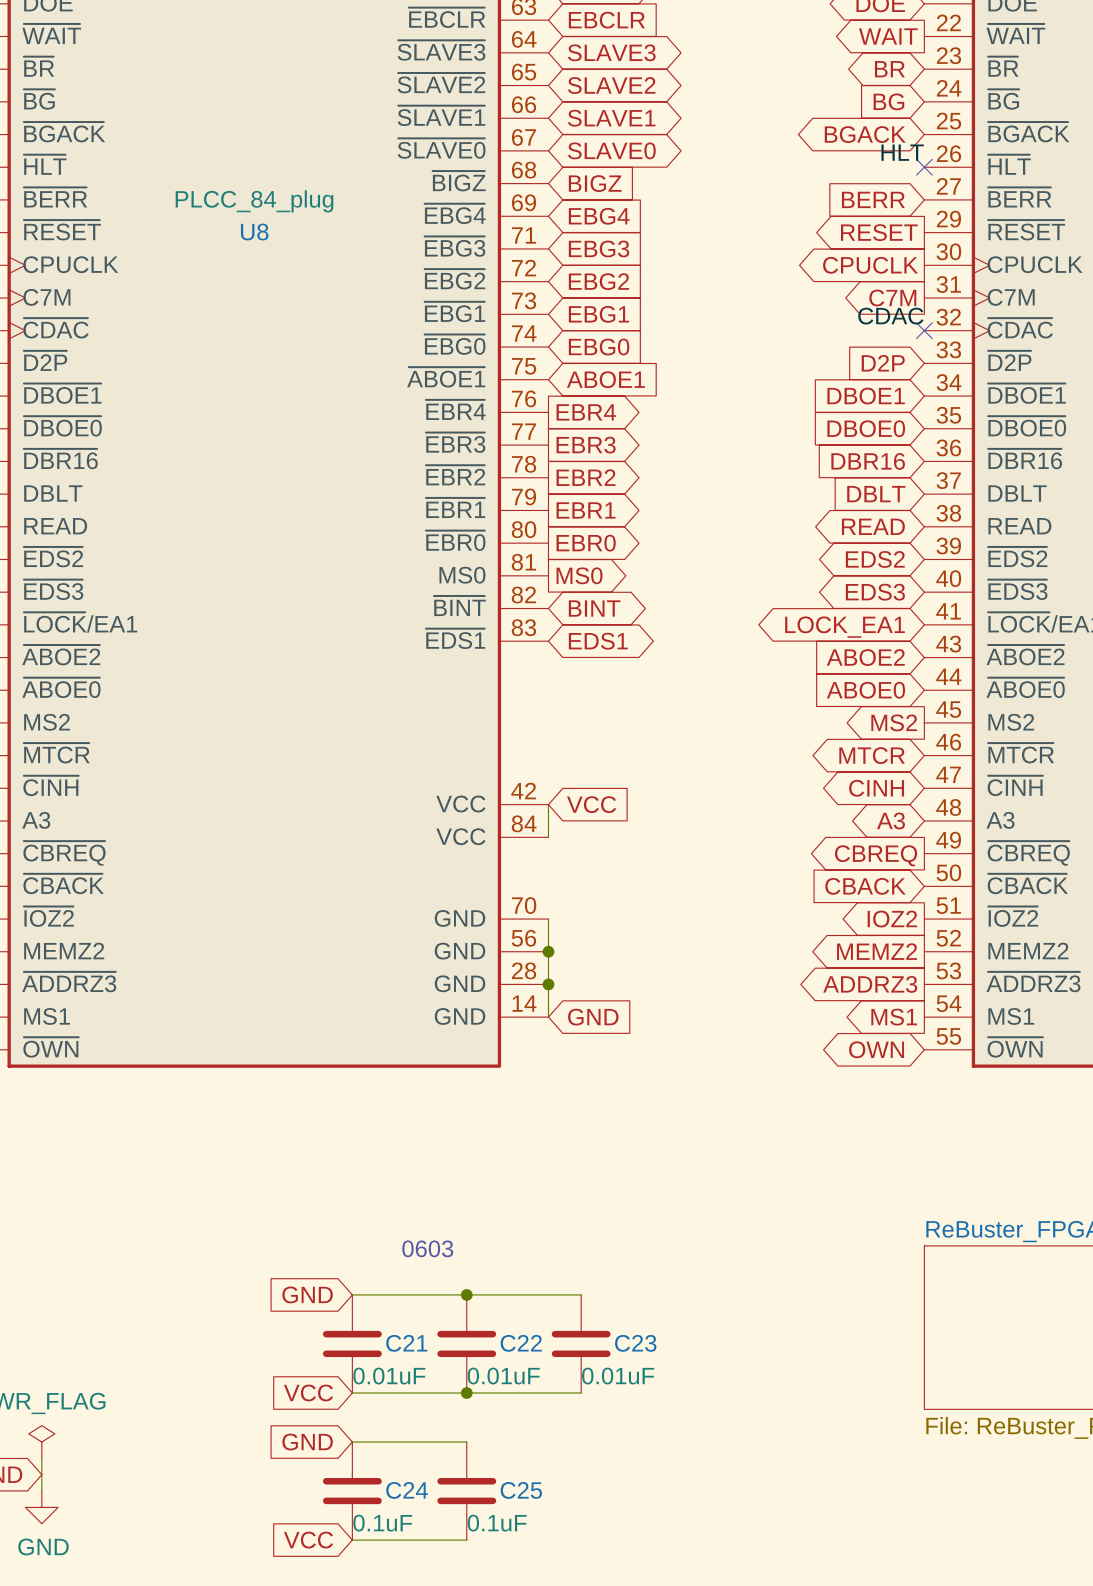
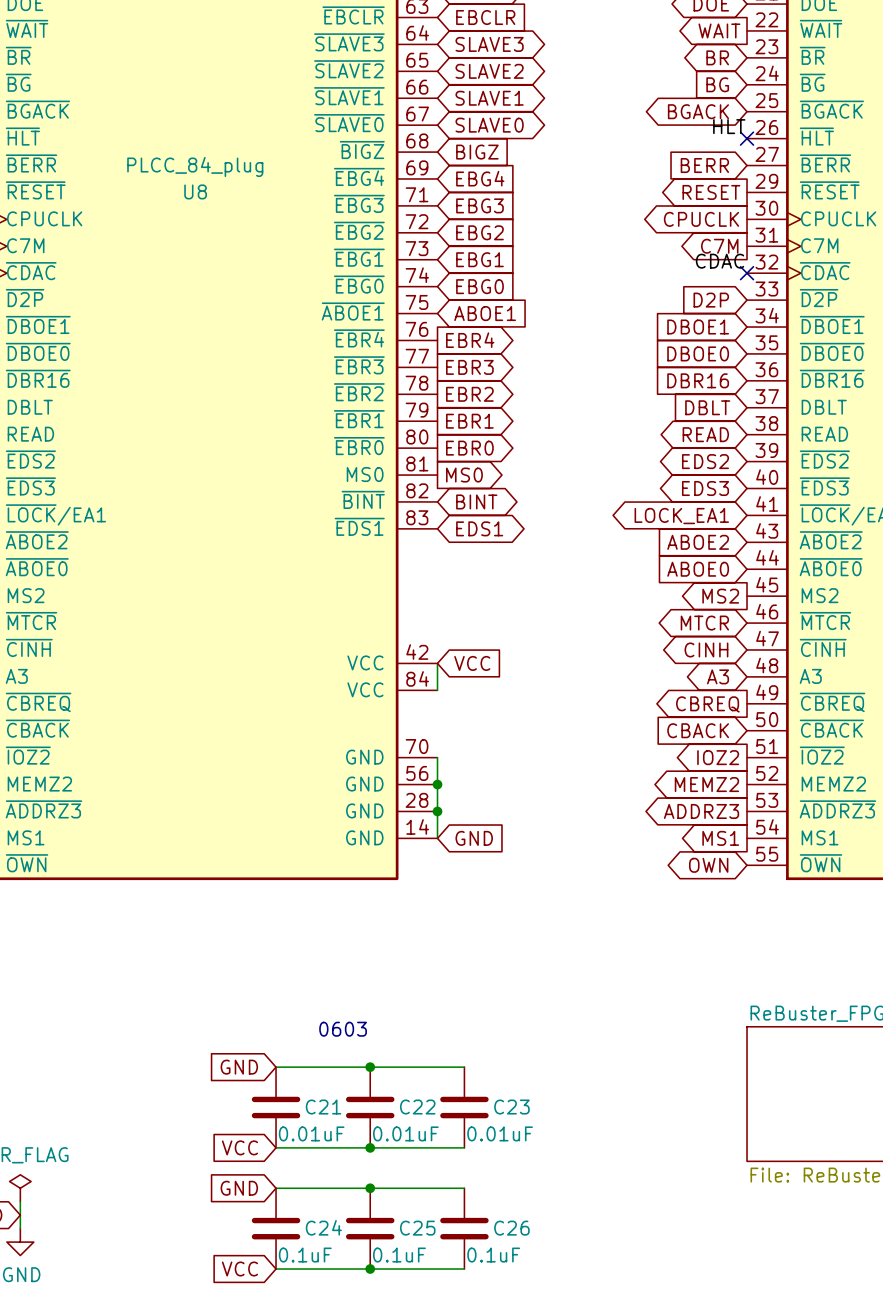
wire: none -> (370, 1188) (464, 1188)
junction: none -> (370, 1188)
C26: none -> 0.1uF (464, 1228)
wire: none -> (370, 1269) (464, 1269)
junction: none -> (370, 1269)

